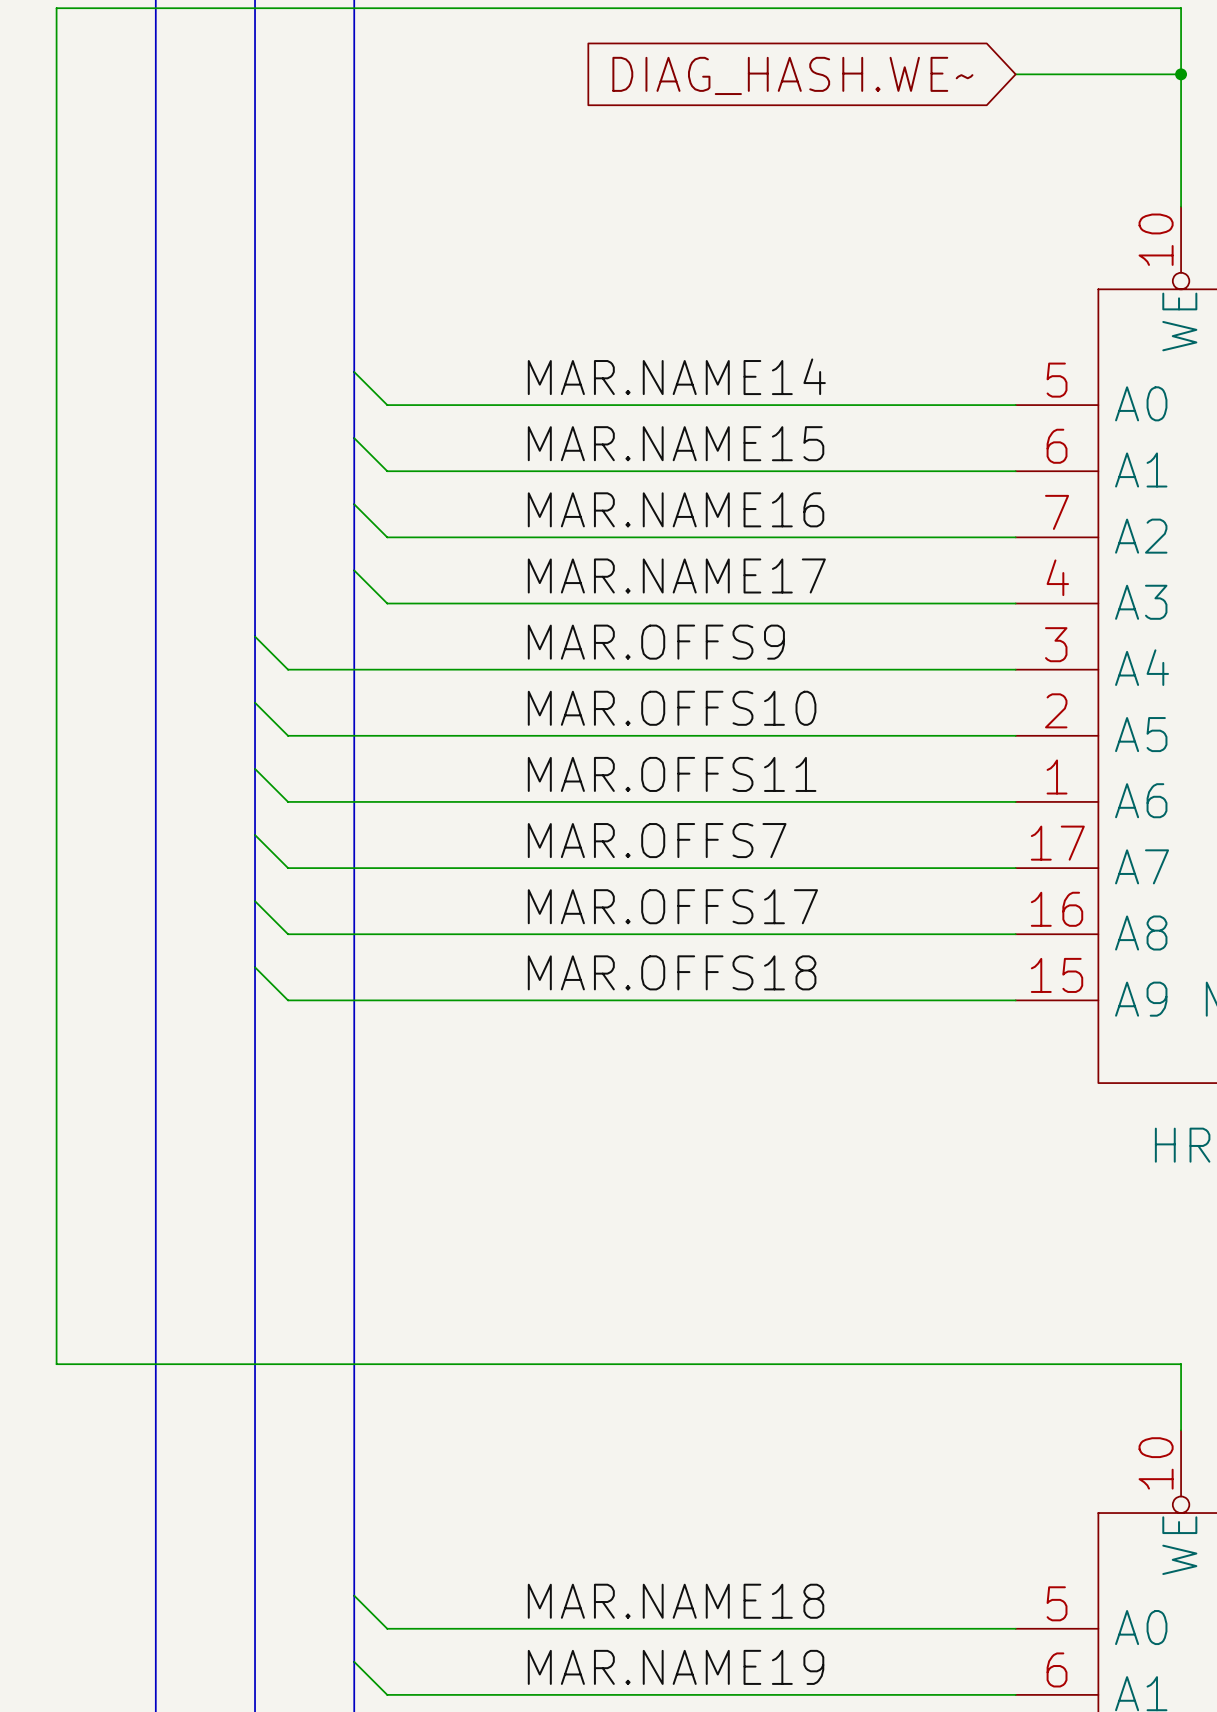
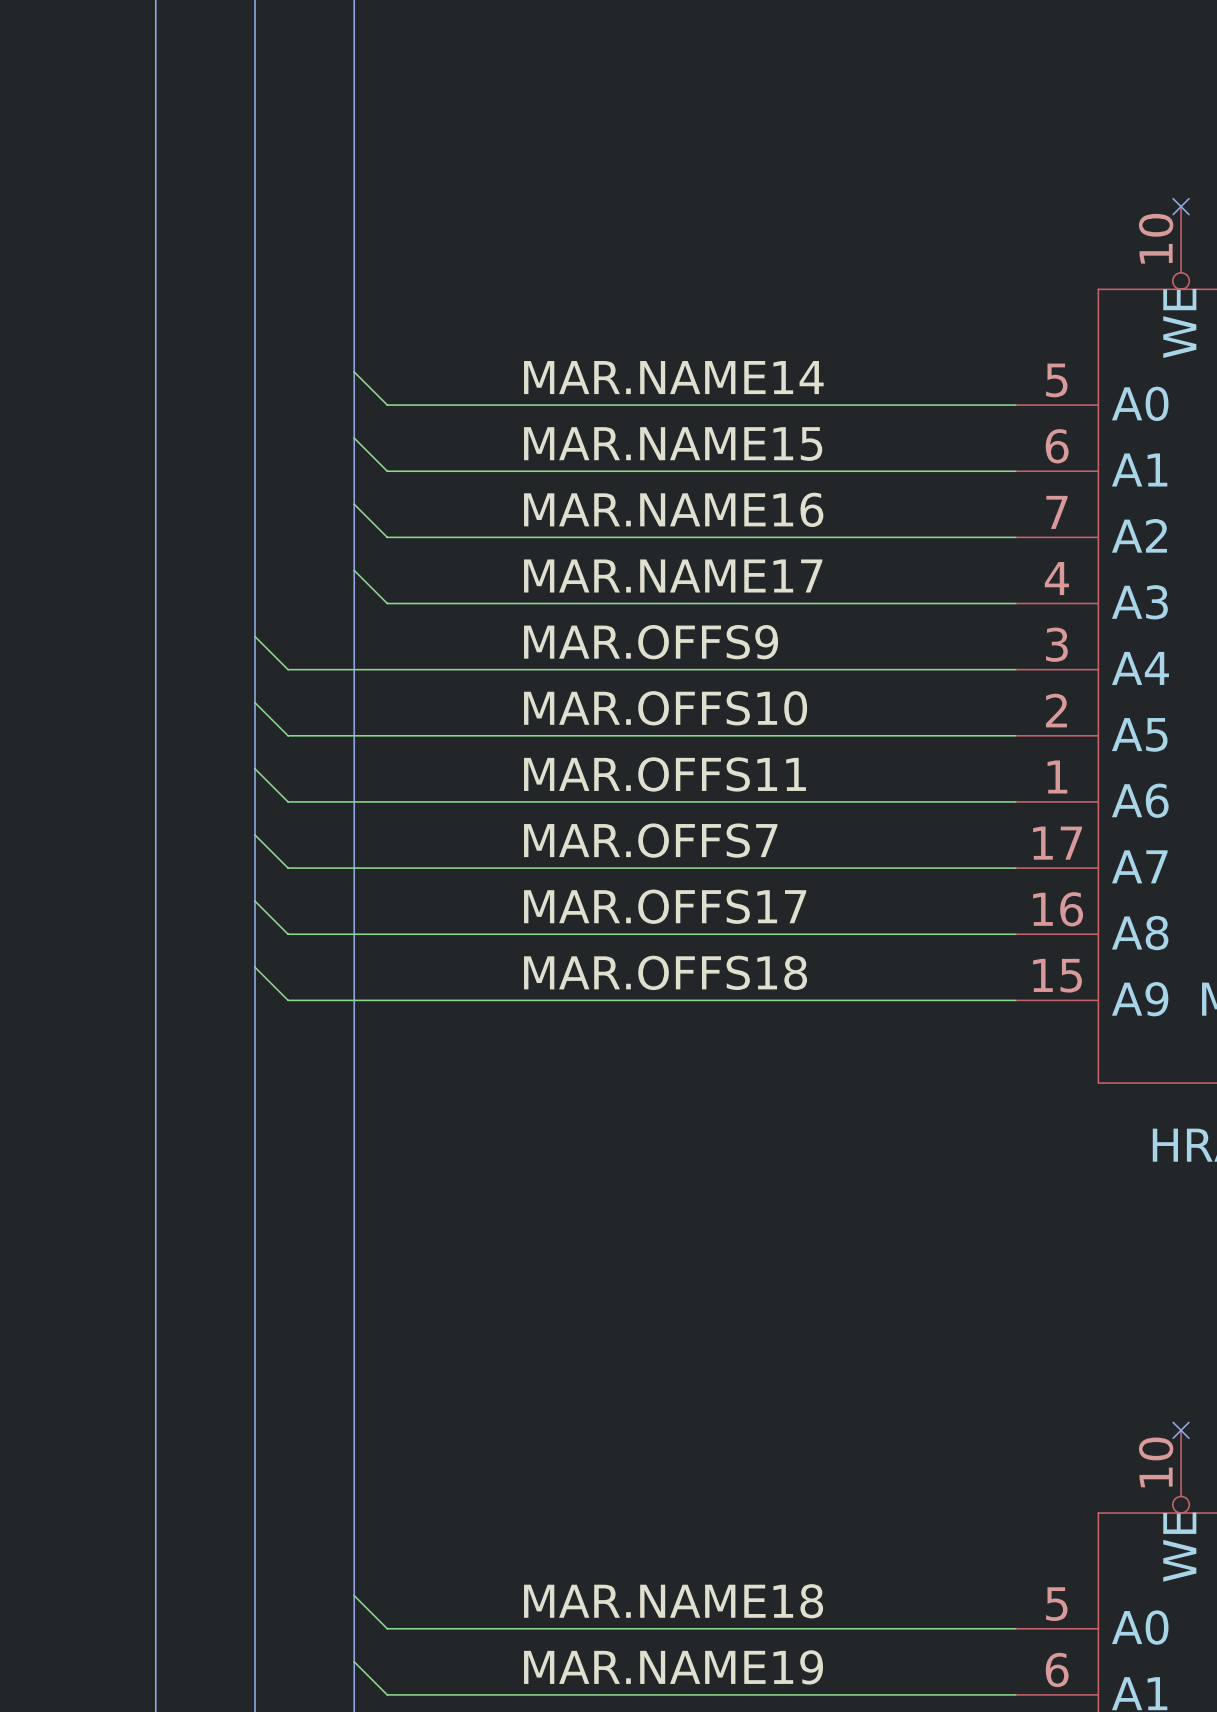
wire: (1015, 74) (1181, 74) -> none
junction: (1181, 74) -> none
global label: DIAG_HASH.WE~ (792, 75) -> none
wire: (1181, 206) (1181, 8) (56, 8) (56, 1364) (1181, 1364) (1181, 1430) -> none
no-connect mark: none -> (1181, 206)
no-connect mark: none -> (1181, 1430)

